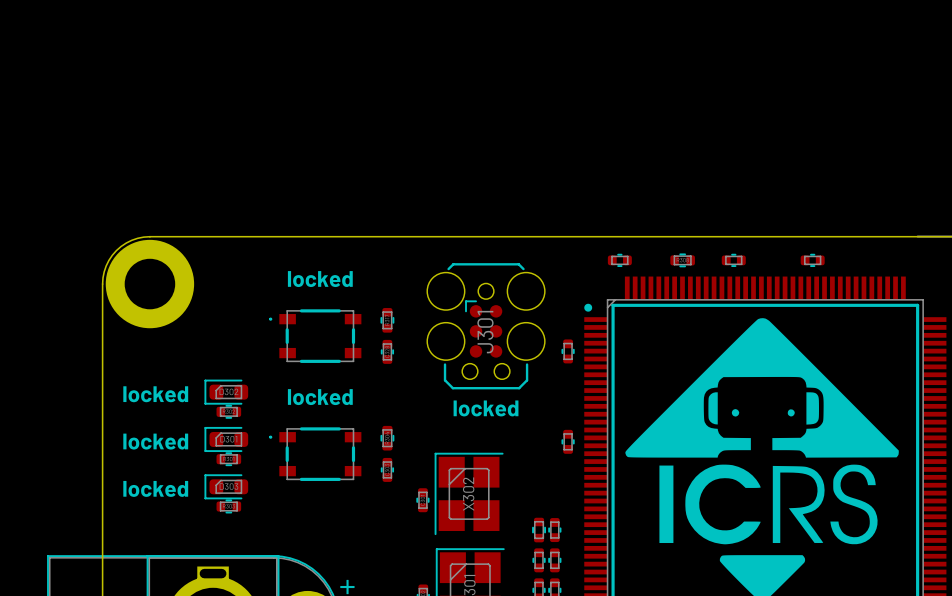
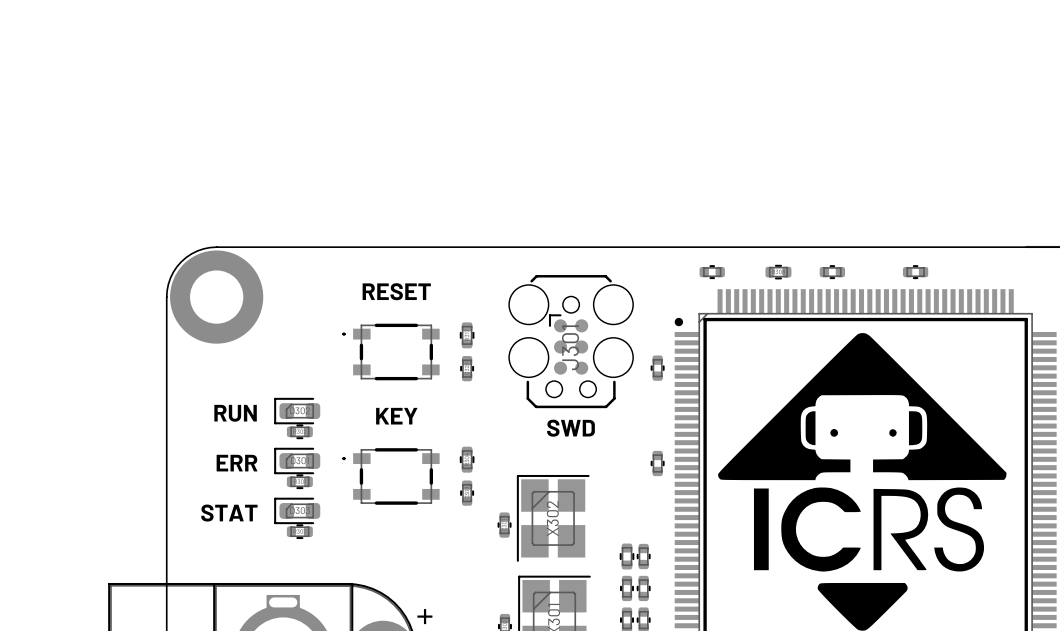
text: locked (320, 279) -> RESET (396, 291)
text: locked (155, 394) -> RUN (235, 413)
text: locked (320, 397) -> KEY (396, 416)
text: locked (486, 408) -> SWD (571, 428)
text: locked (155, 441) -> ERR (237, 463)
text: locked (155, 488) -> STAT (229, 513)

